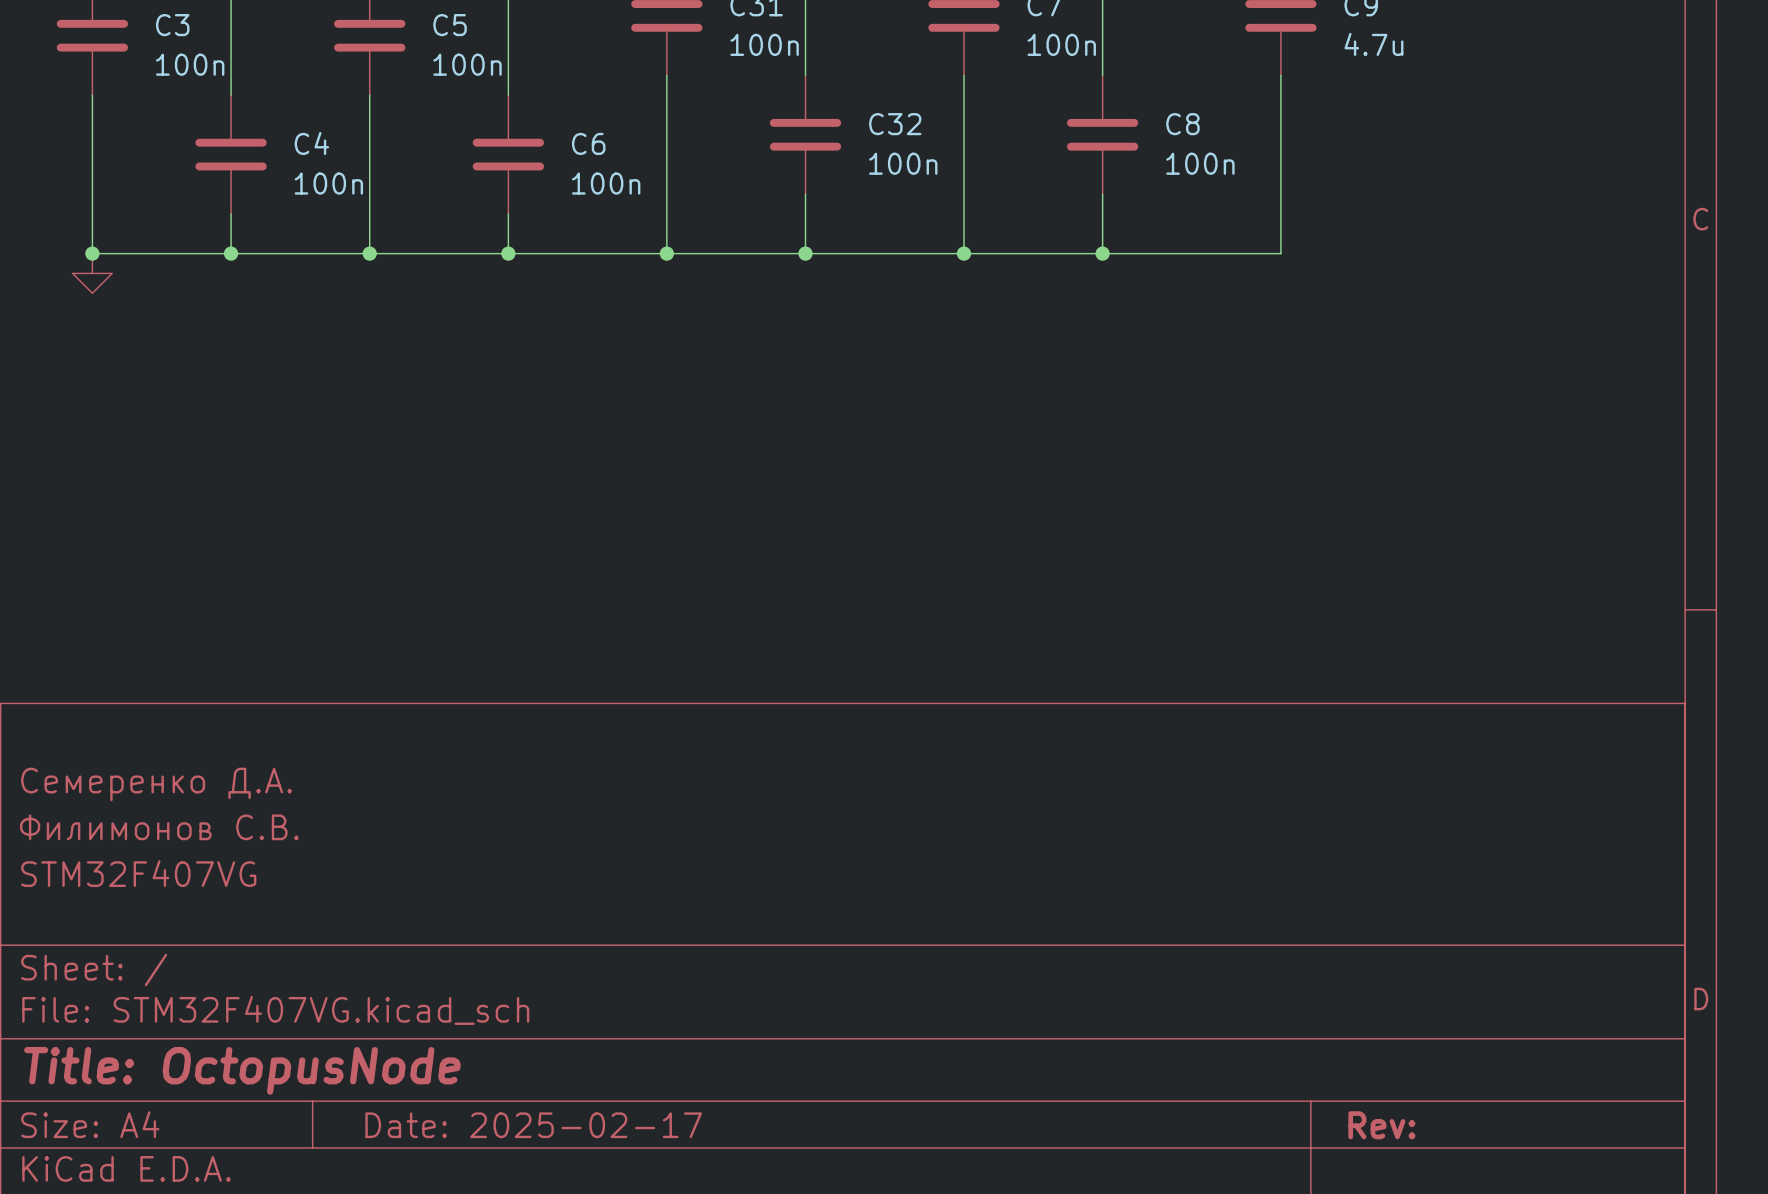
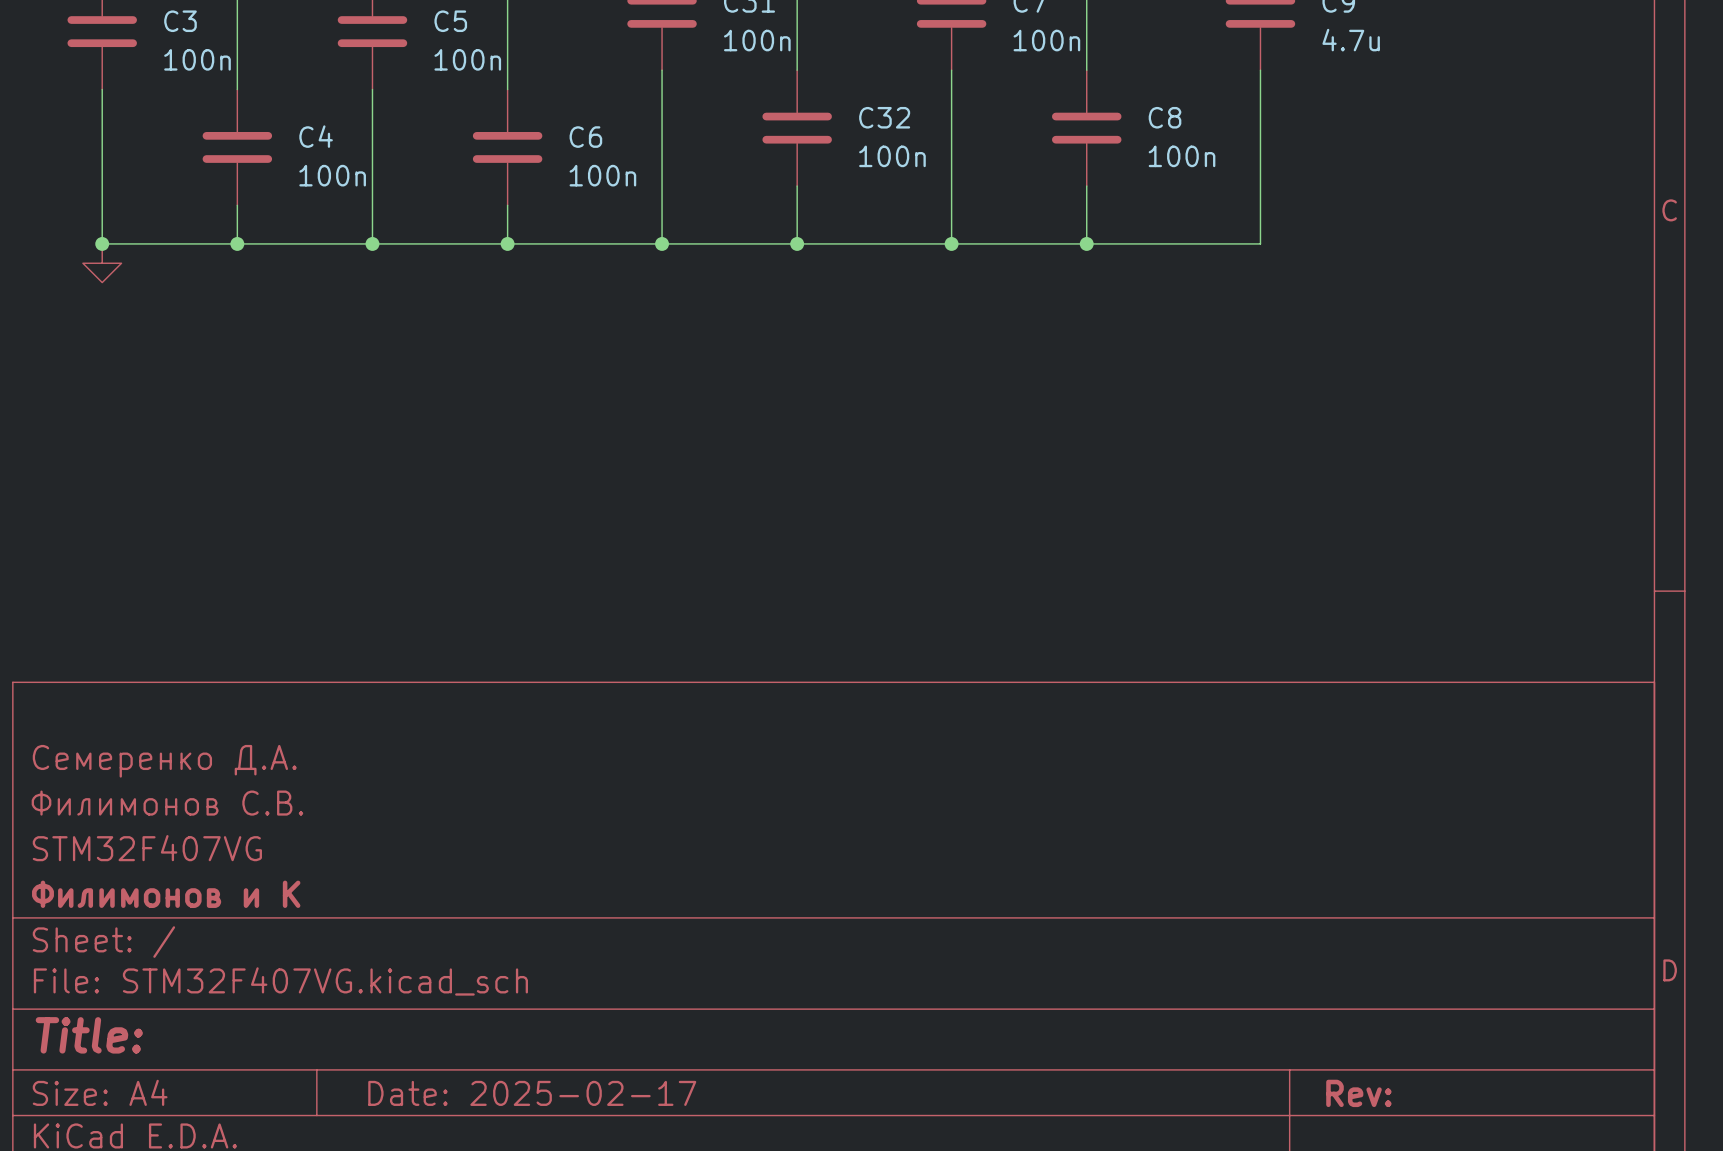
title block: none -> Филимонов и К (166, 894)
title block: Title: OctopusNode (242, 1070) -> Title: (89, 1035)

